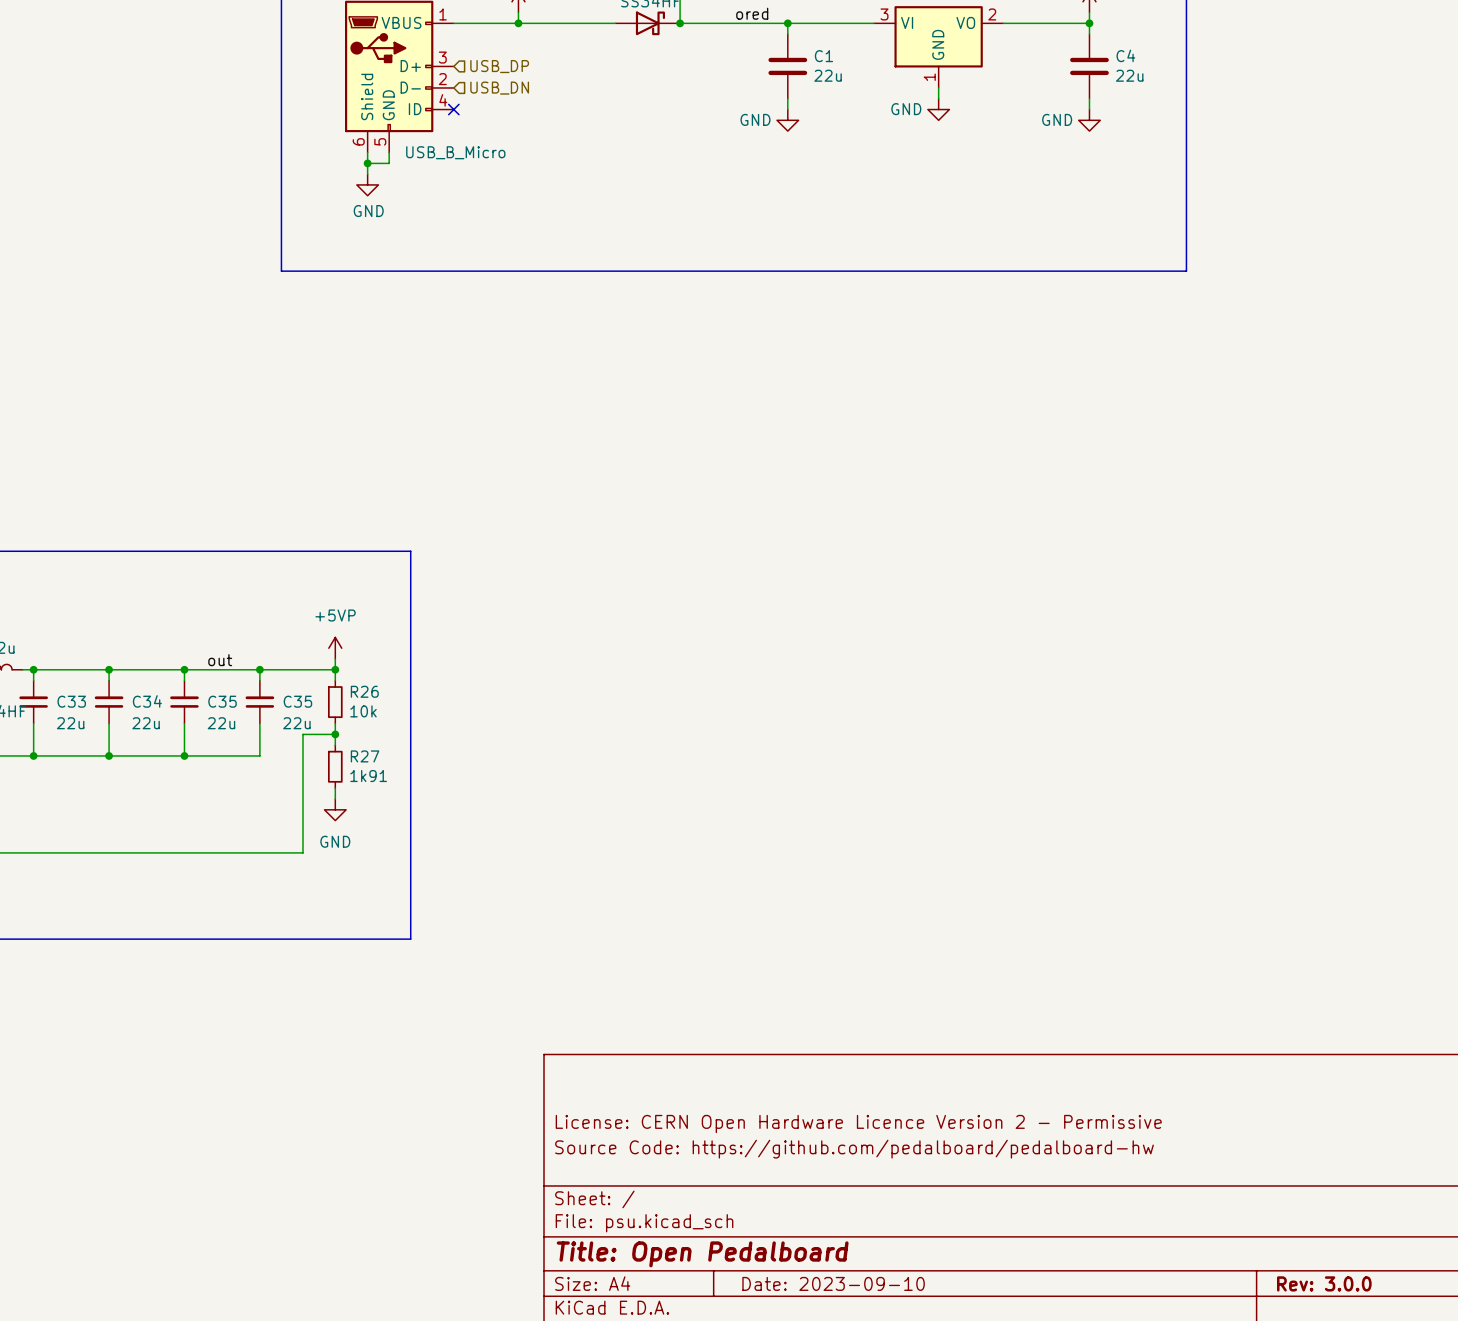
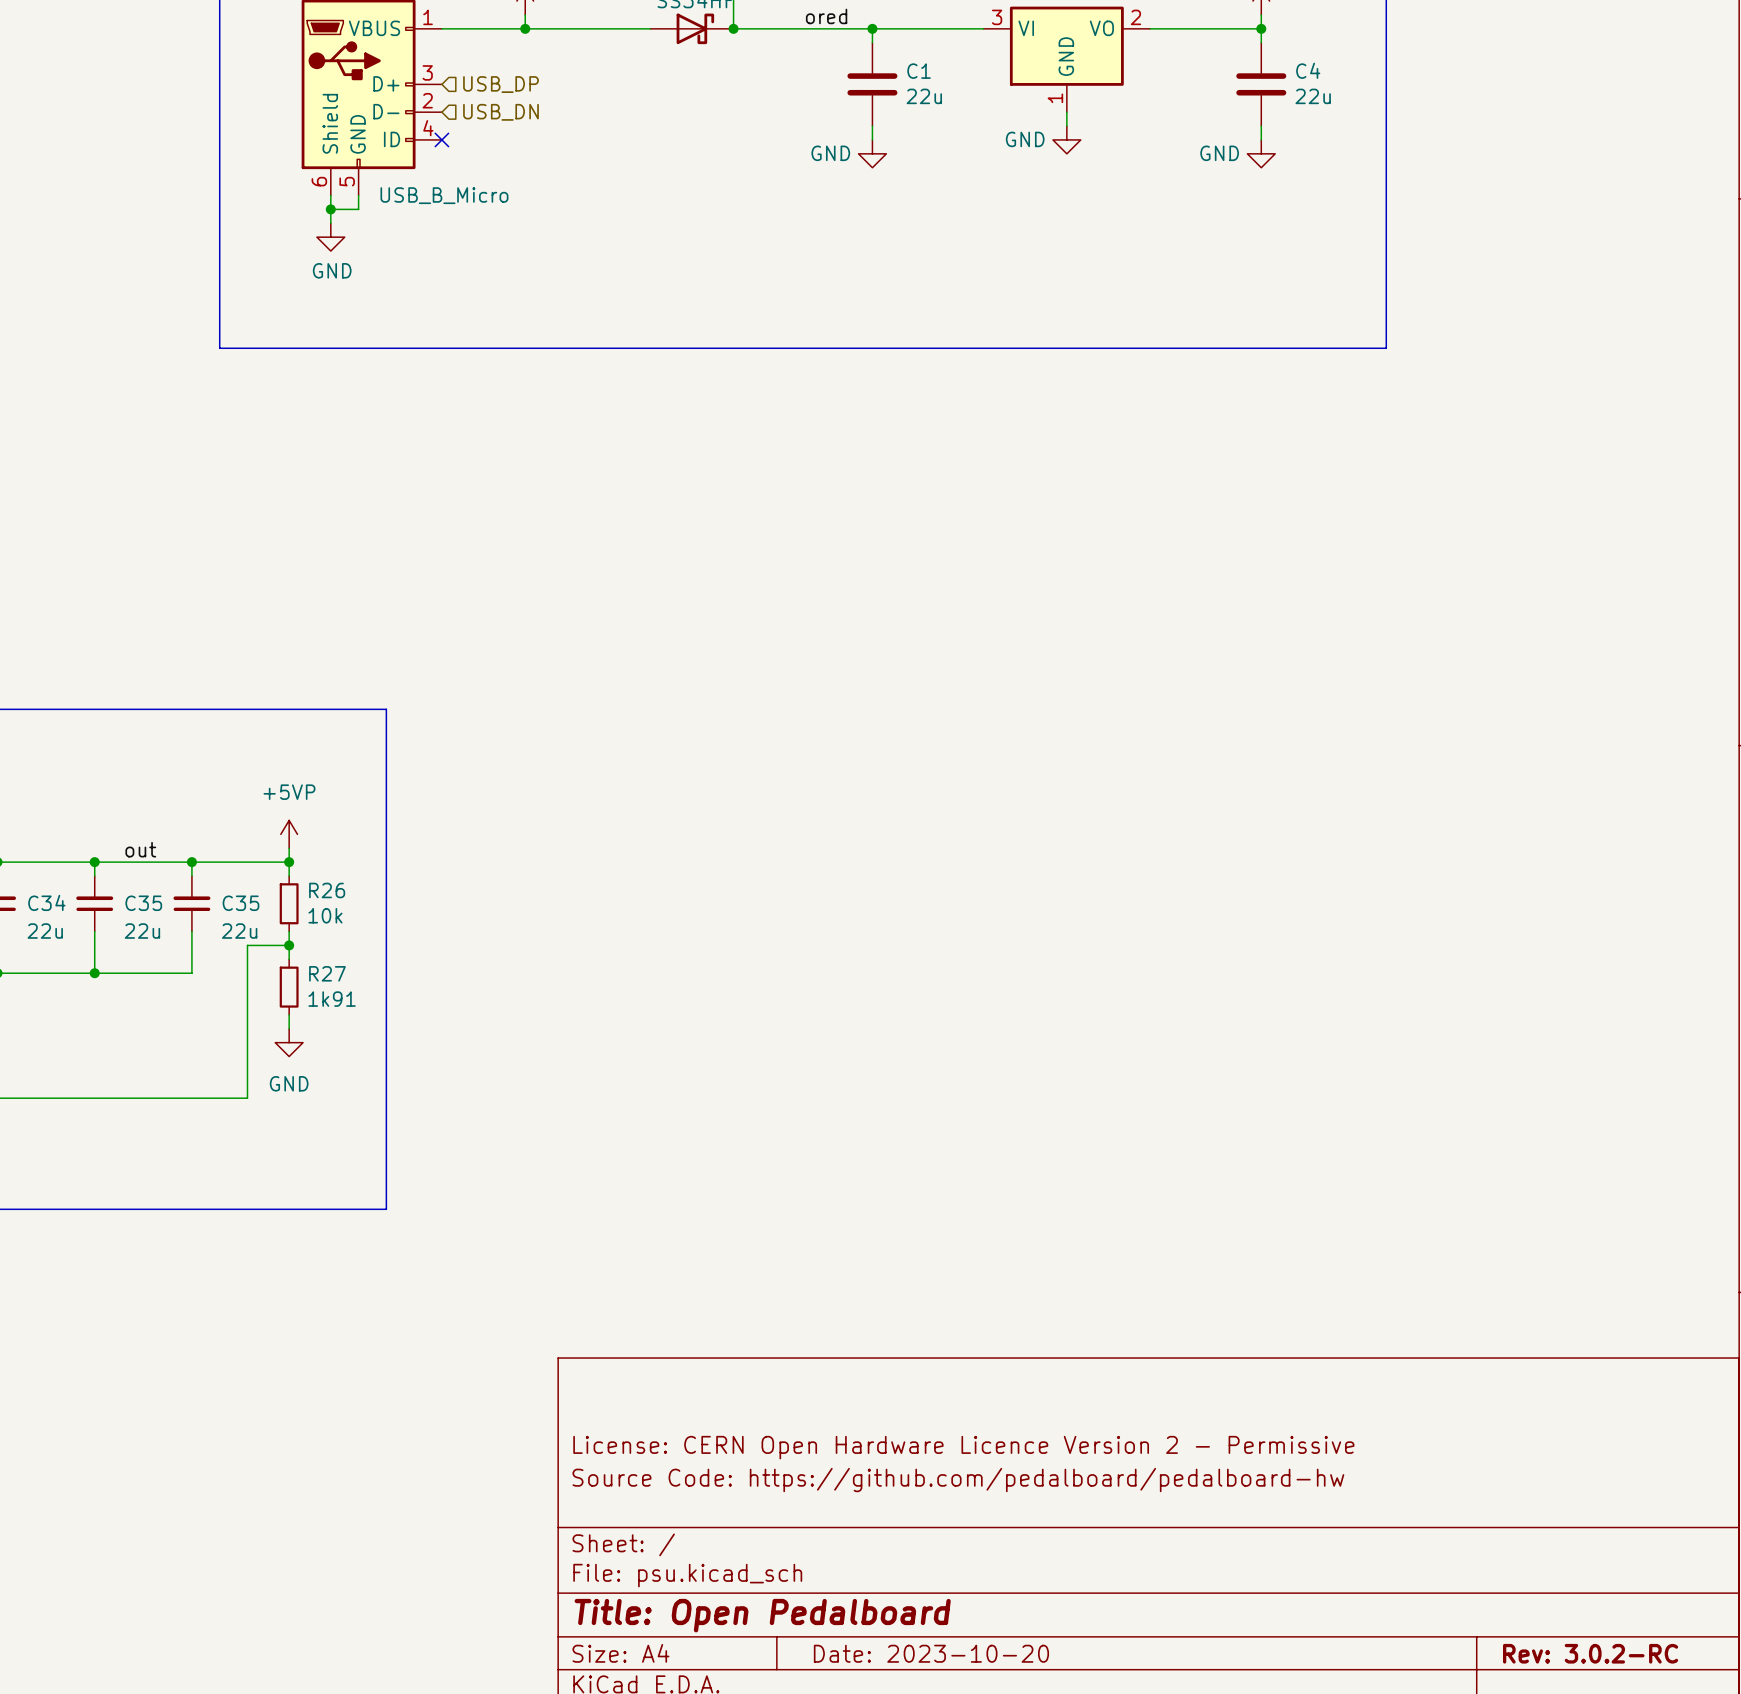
title block: Date: 2023-09-10 (833, 1283) -> Date: 2023-10-20 (931, 1653)
title block: Rev: 3.0.0 (1324, 1283) -> Rev: 3.0.2-RC (1590, 1653)

